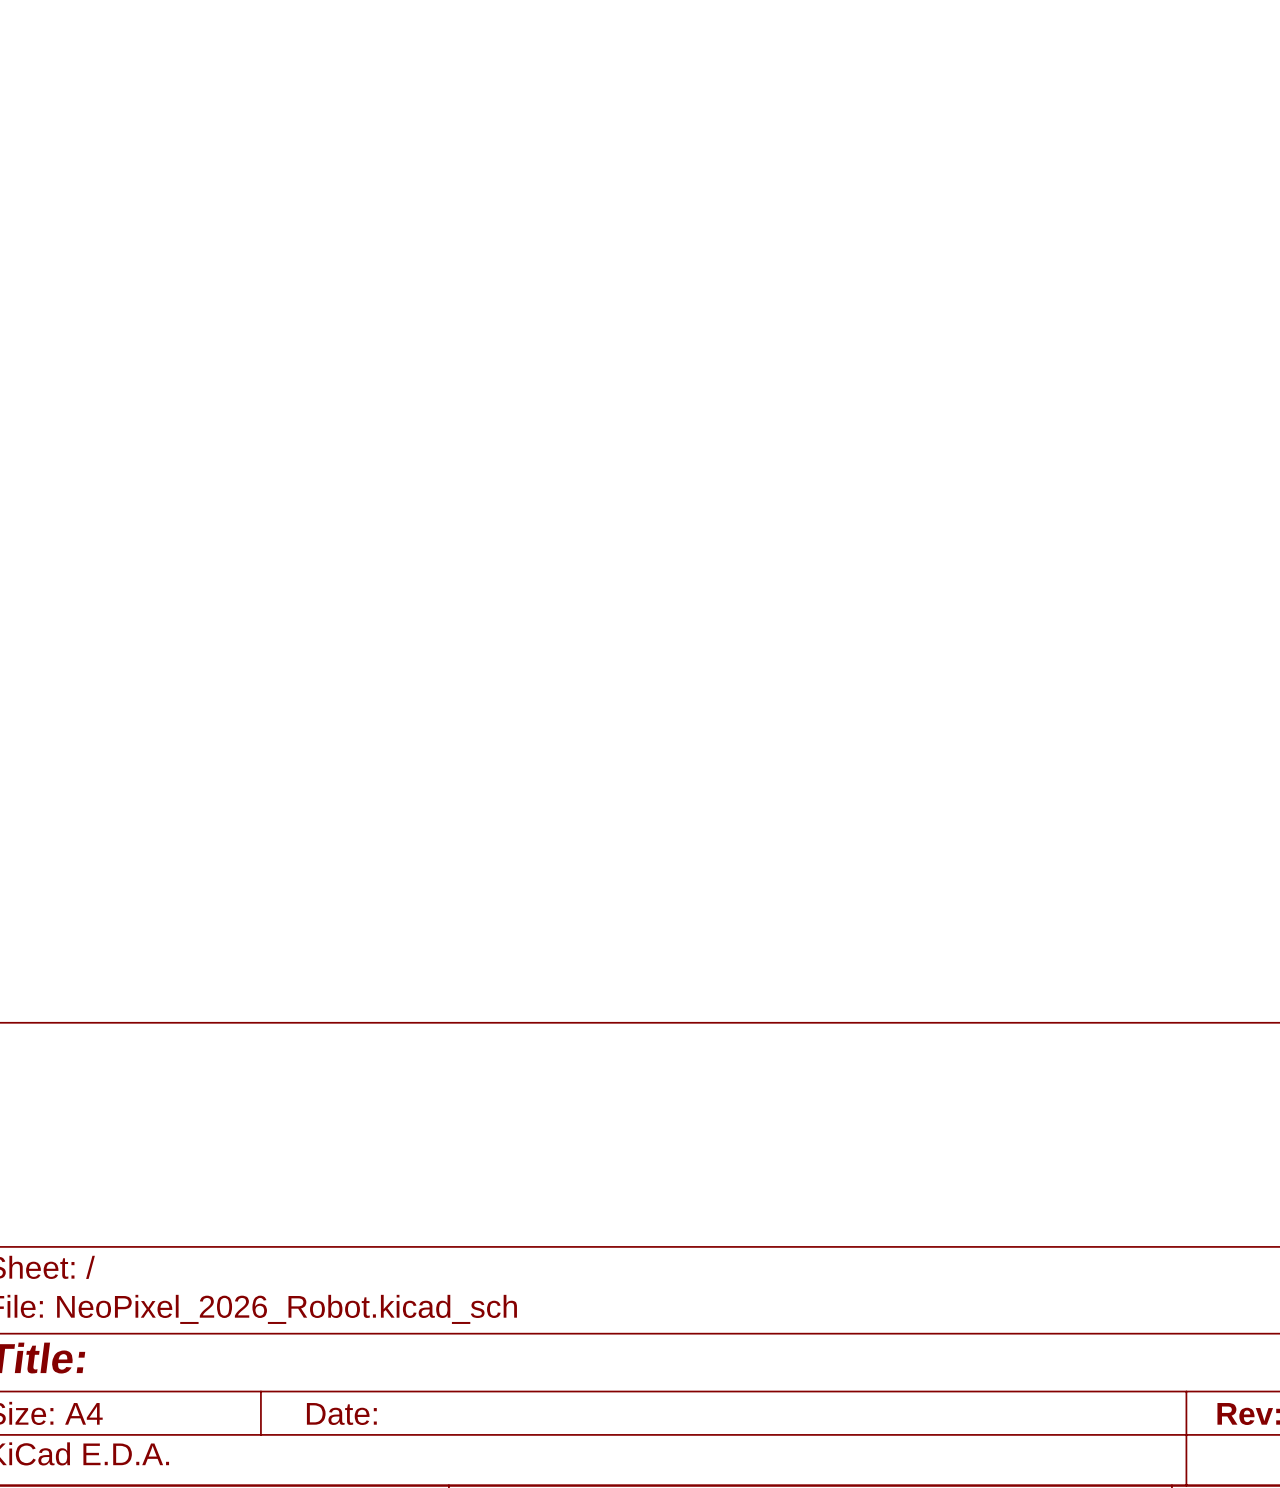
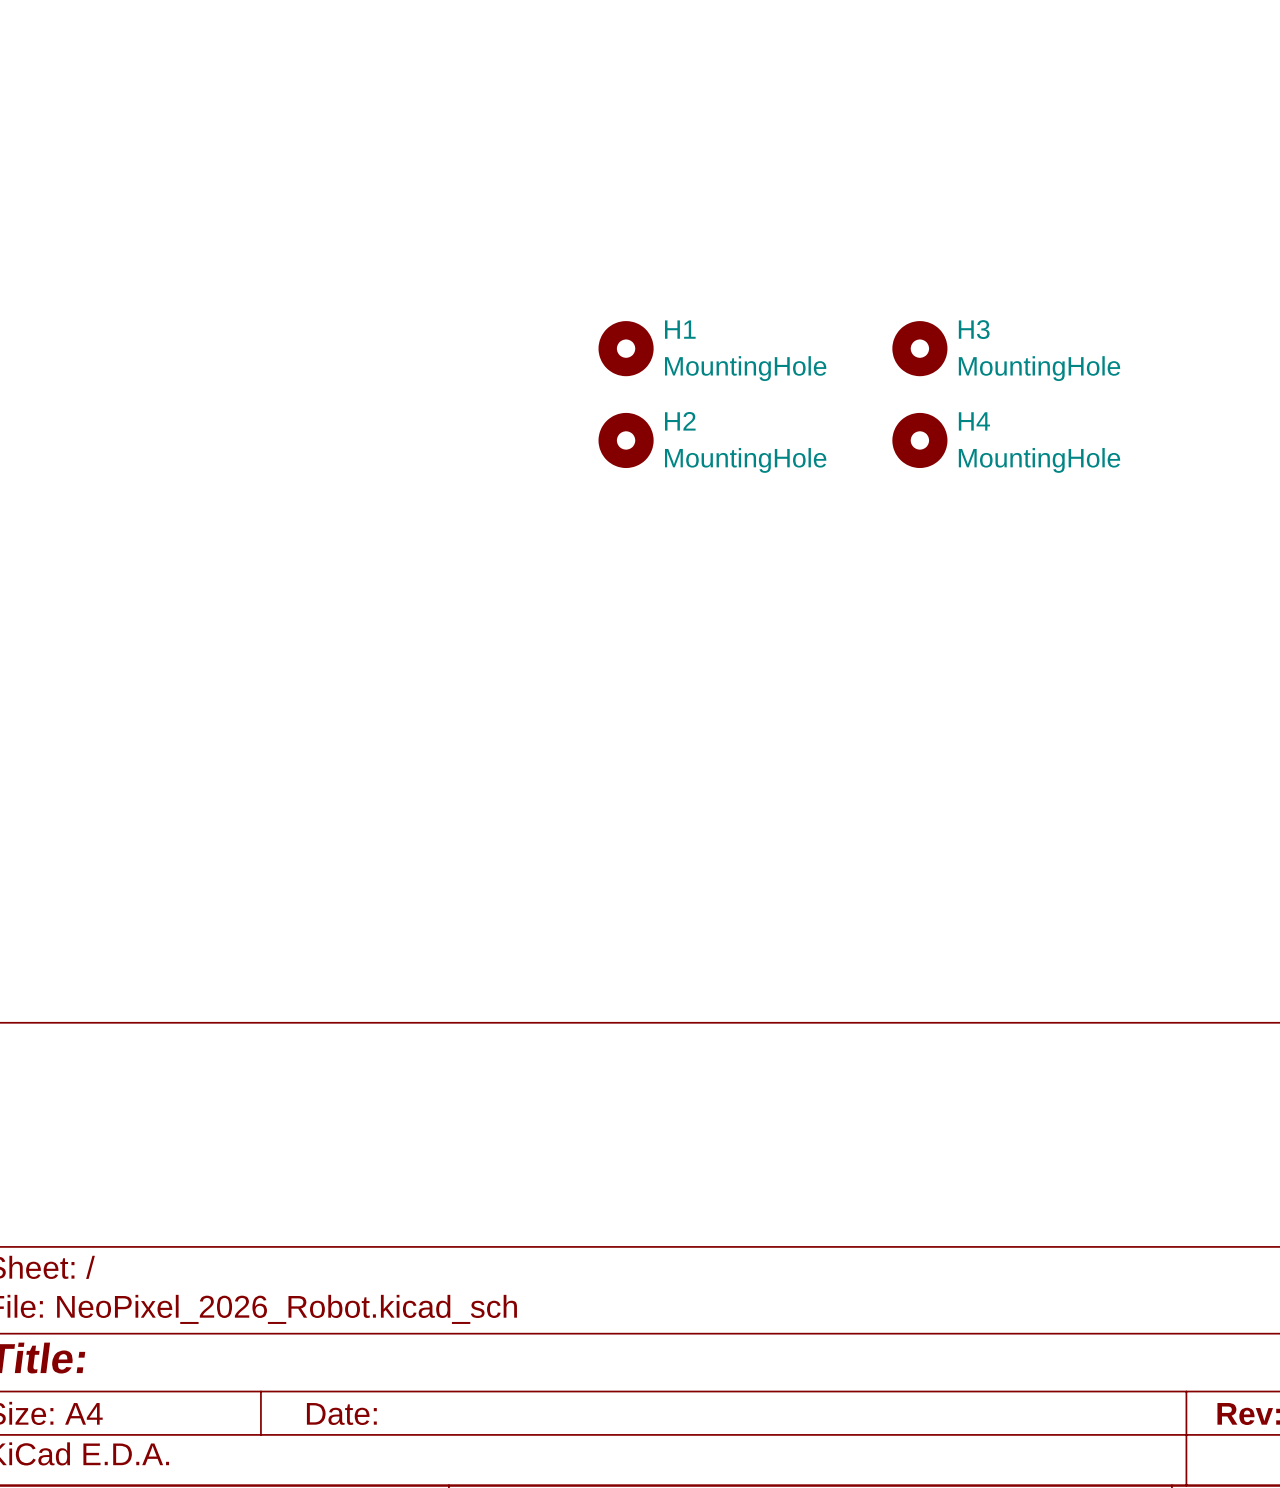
H1: none -> MountingHole (626, 348)
H3: none -> MountingHole (919, 348)
H2: none -> MountingHole (626, 440)
H4: none -> MountingHole (919, 440)

